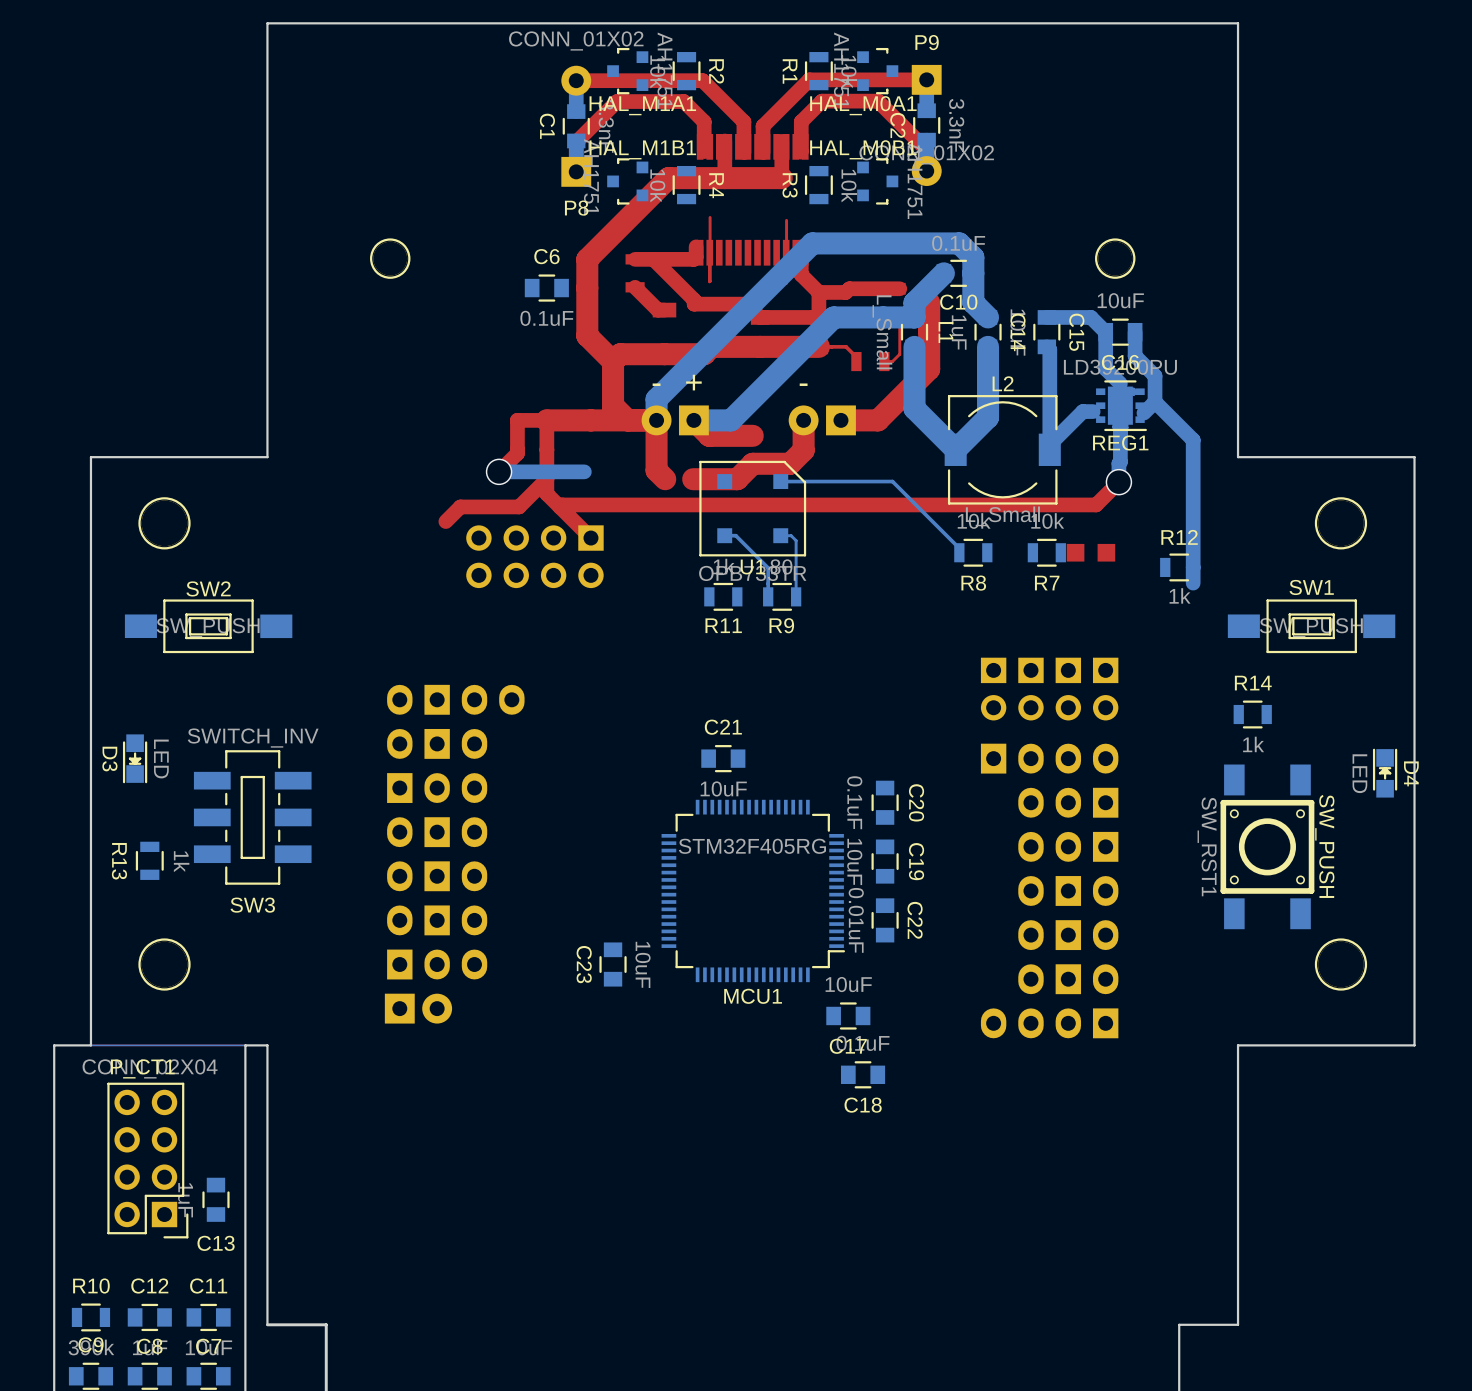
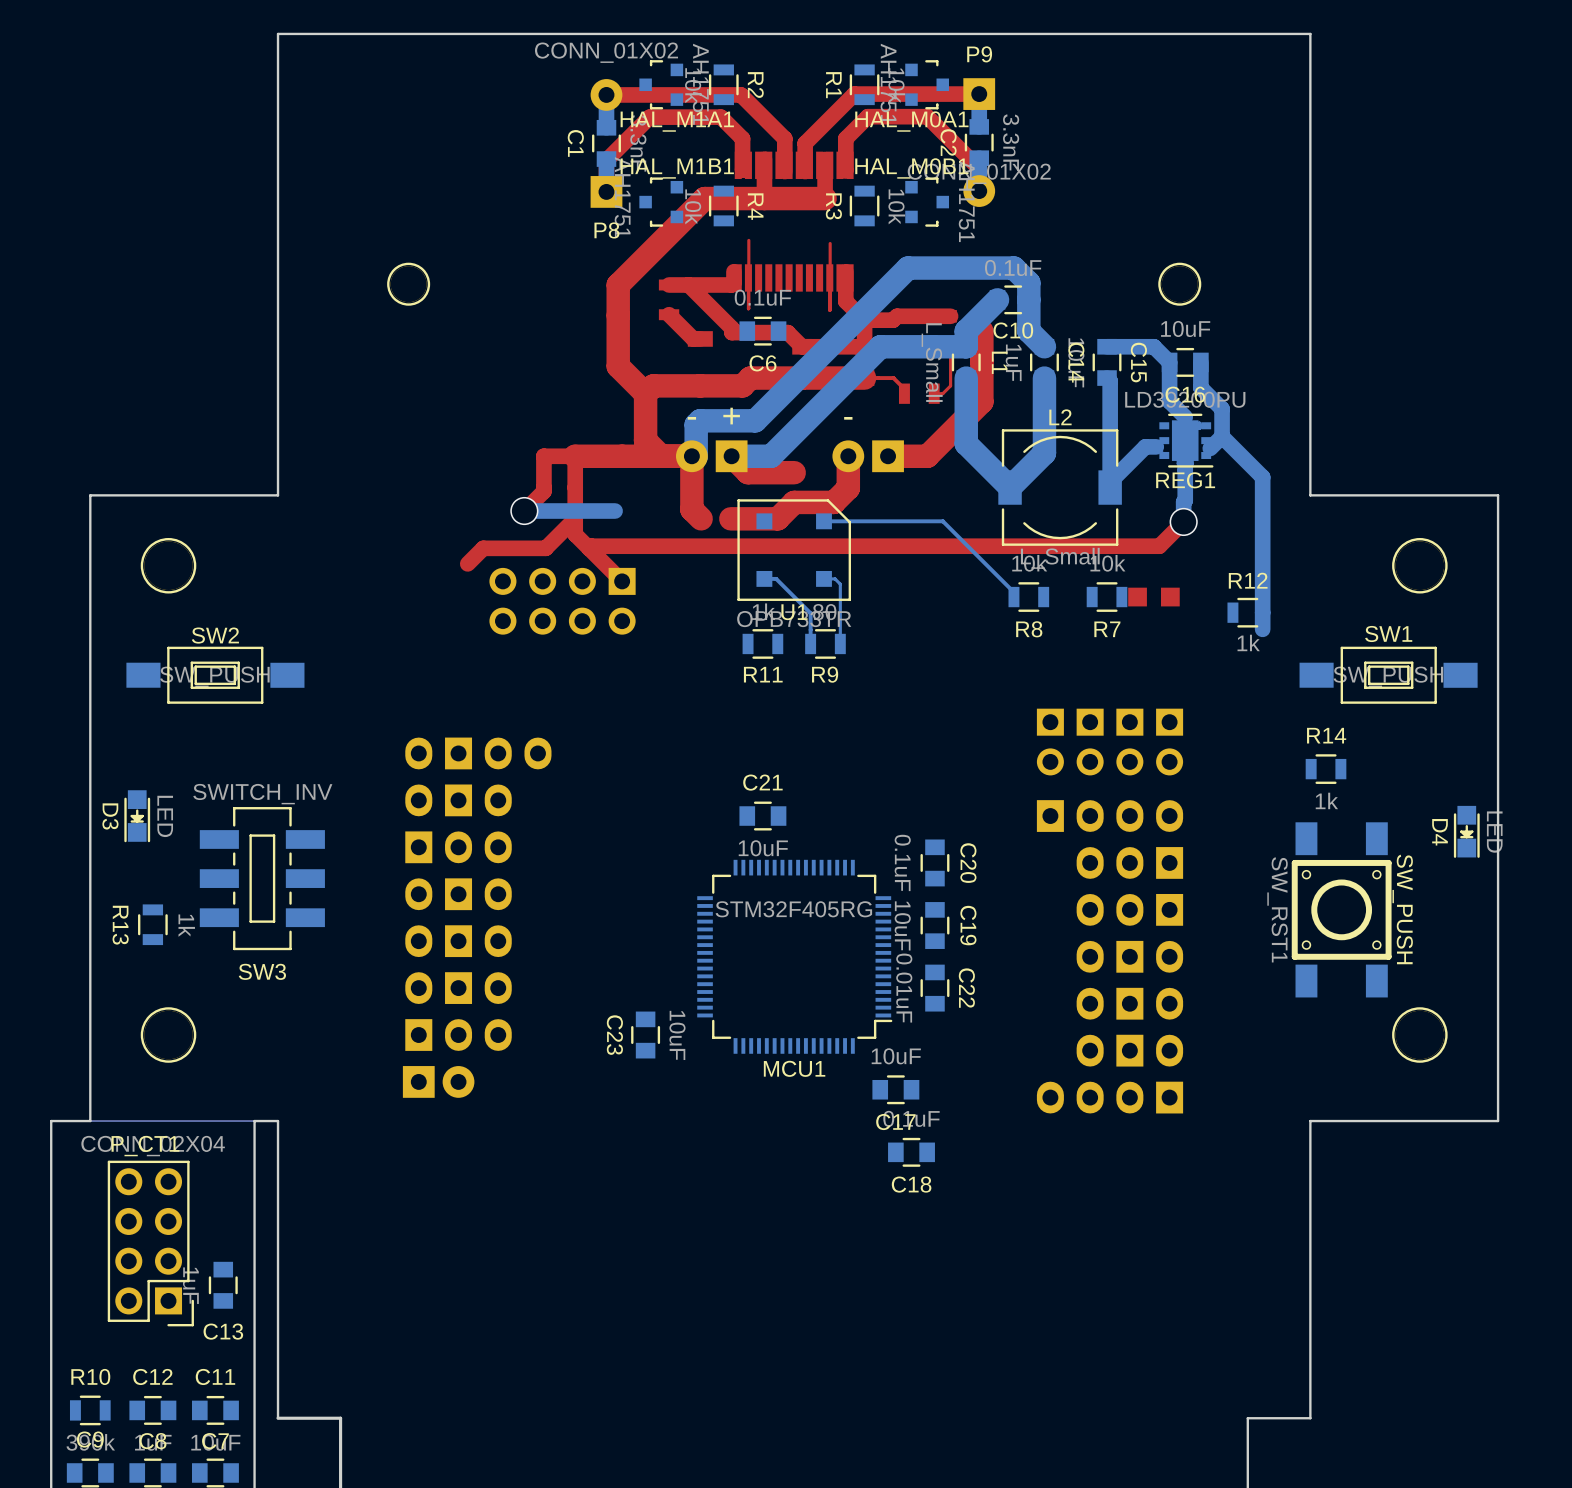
bottom track: (859, 243) (812, 243) (656, 399) (656, 420) -> (908, 268) (755, 420) (700, 420) (696, 424) (696, 456) (691, 456)
C6 name position: C6 (546, 256) -> C6 (762, 363)
C6 position: (546, 288) -> (762, 331)
C6 value position: 0.1uF (546, 318) -> 0.1uF (762, 297)
D4 rotation: 0° (1385, 773) -> 180° (1466, 831)

